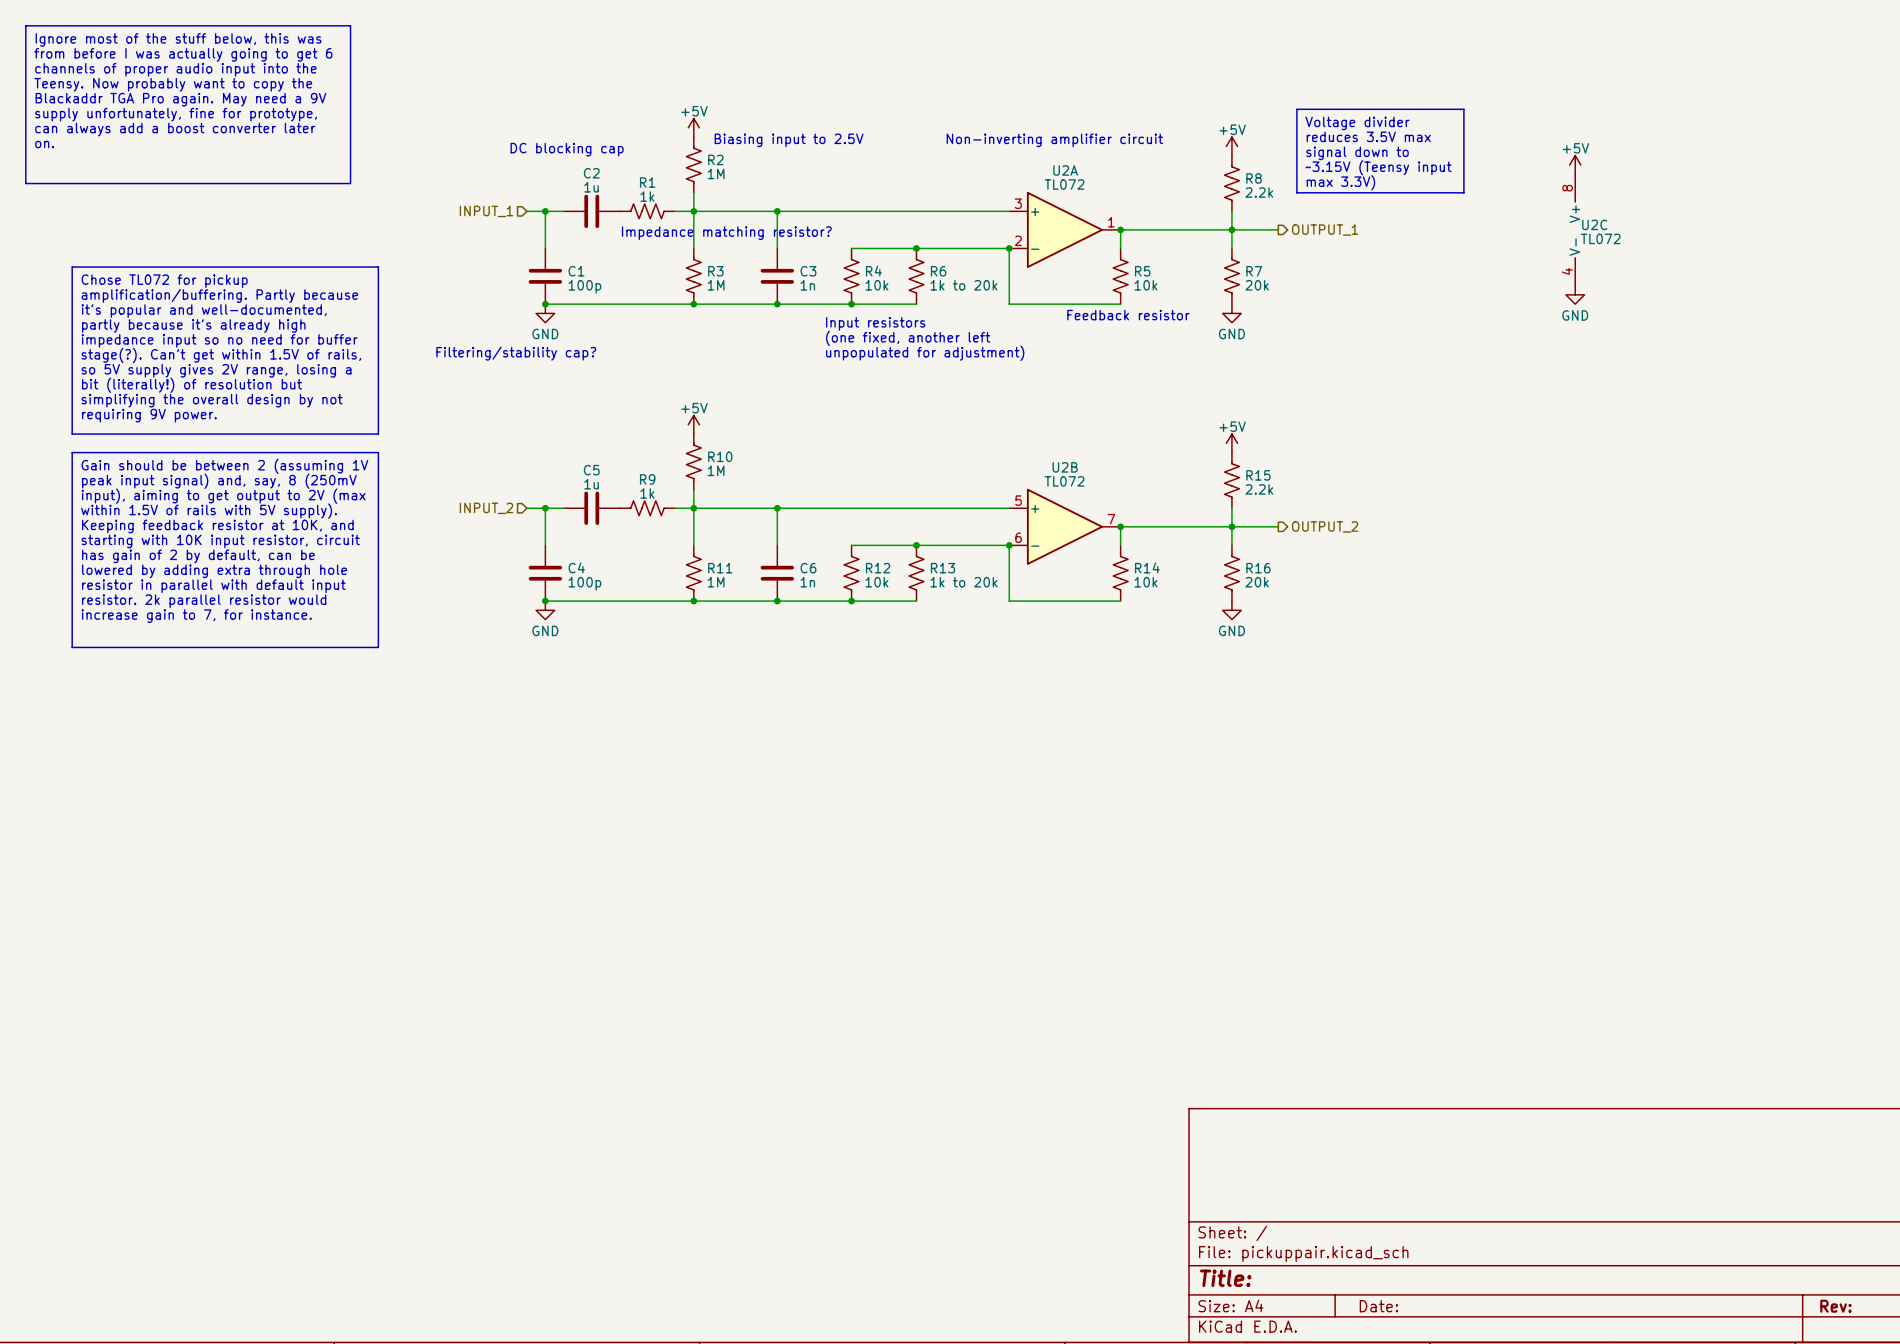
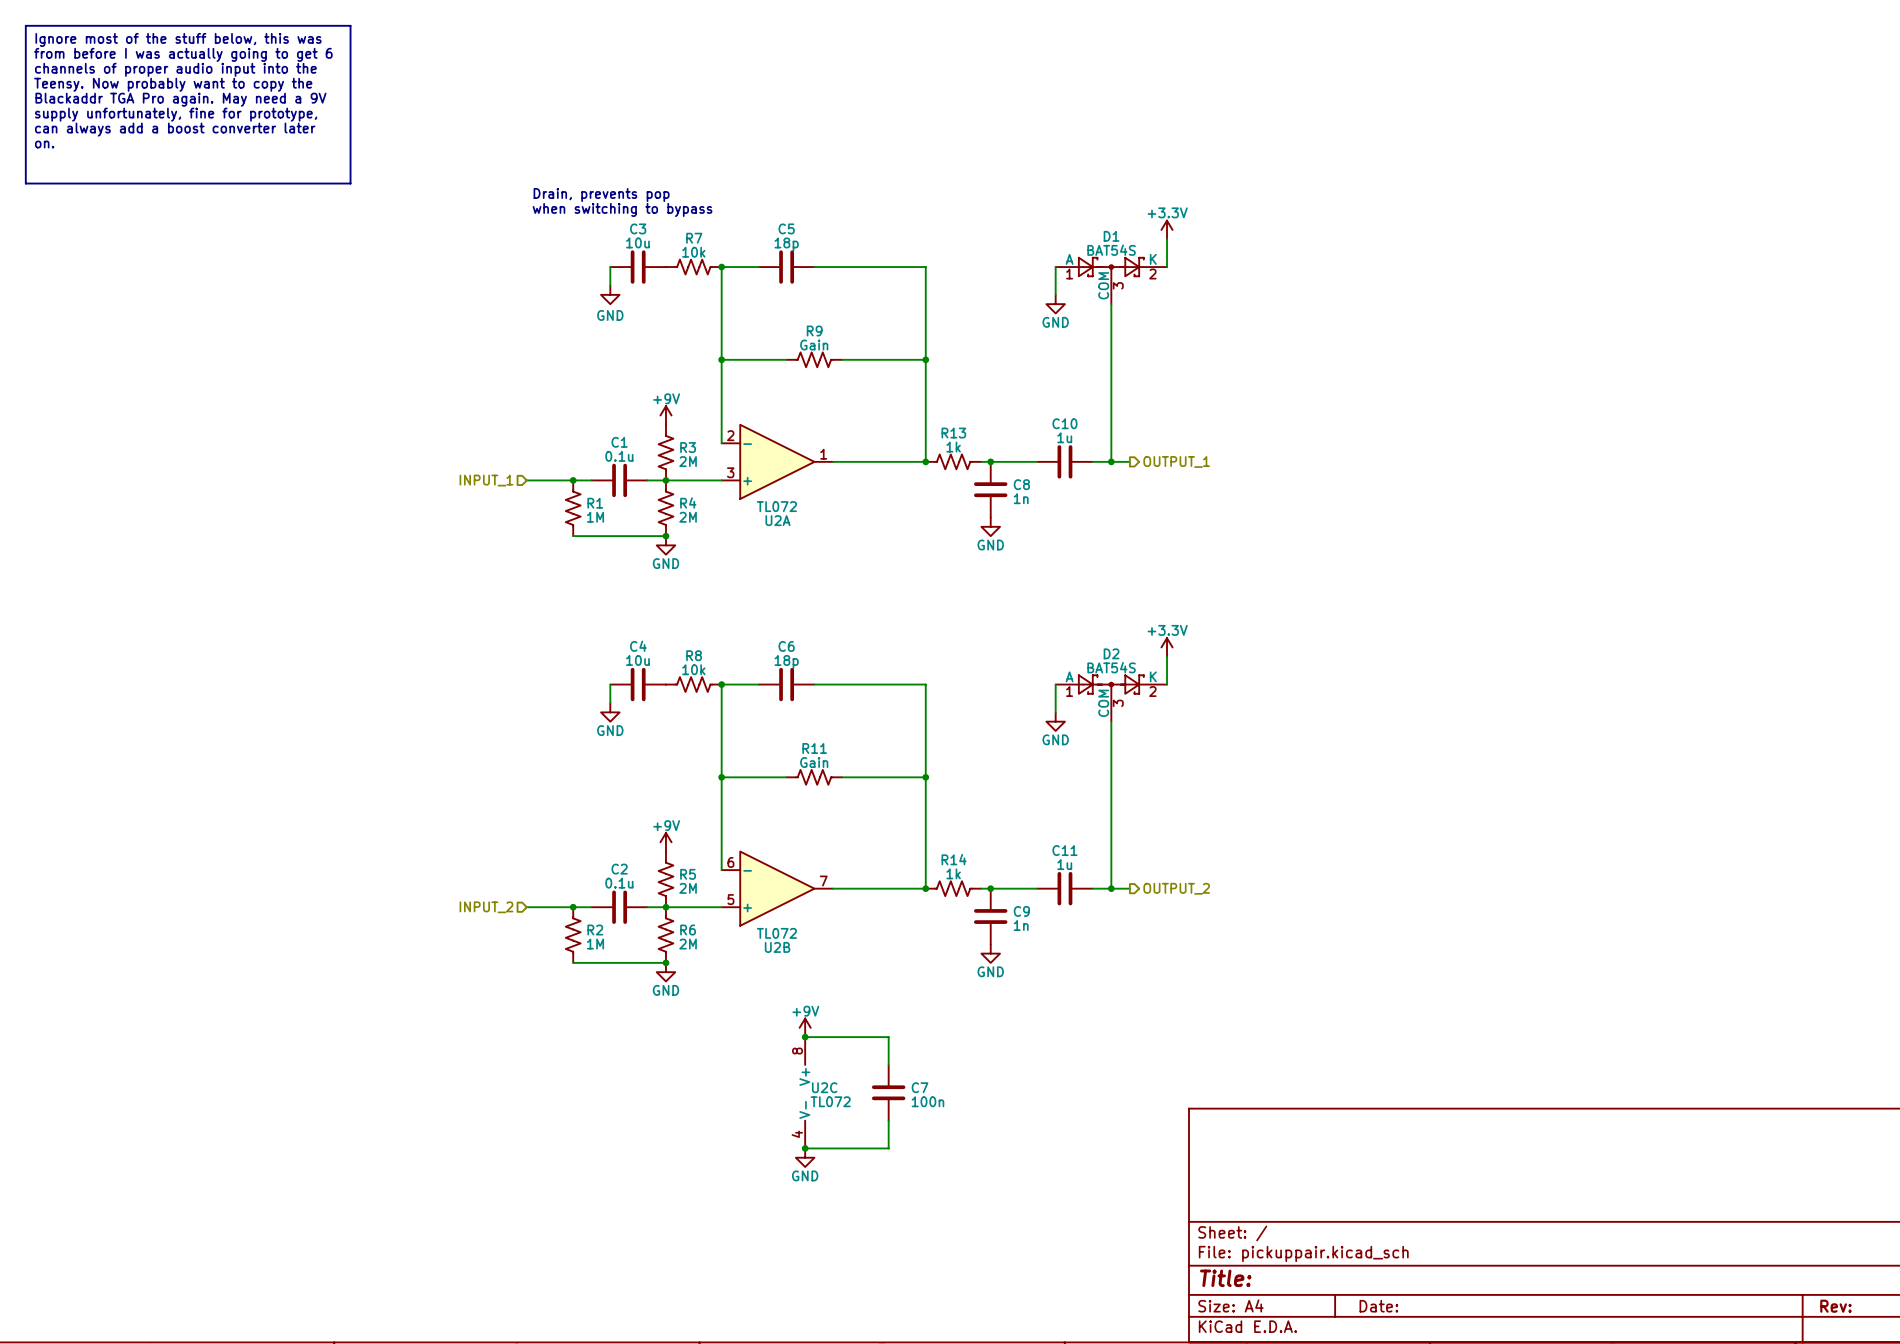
line: (1296, 109) (1463, 109) (1463, 192) (1296, 192) (1296, 109) -> none
text: Voltage divider (1357, 123) -> none
power symbol: +5V (693, 127) -> none
text: reduces 3.5V max (1368, 136) -> none
text: Biasing input to 2.5V (789, 140) -> none
text: Non-inverting amplifier circuit (1054, 140) -> none
power symbol: +5V (1231, 146) -> none
text: DC blocking cap (567, 149) -> none
text: signal down to (1357, 153) -> none
R2 position: (693, 164) -> (573, 935)
power symbol: +5V (1575, 164) -> none
text: ~3.15V (Teensy input (1378, 167) -> none
R8 name position: R8 (1254, 178) -> R8 (694, 655)
text: max 3.3V) (1340, 182) -> none
R8 rotation: 0° (1231, 183) -> 90° clockwise (693, 684)
R8 position: (1231, 183) -> (693, 684)
C2 value: 1u (591, 187) -> 0.1u (619, 883)
wire: (693, 192) (693, 248) -> none
R8 value: 2.2k (1259, 192) -> 10k (693, 669)
text: none -> Drain, prevents pop (601, 195)
R1 value: 1k (647, 196) -> 1M (595, 517)
text: none -> when switching to bypass (622, 209)
hierarchical label: INPUT_1 (486, 211) -> none
wire: (526, 211) (563, 211) -> none
wire: (545, 211) (545, 248) -> none
junction: (545, 211) -> none
C2 position: (591, 211) -> (619, 907)
R1 rotation: 0° (647, 211) -> 90° clockwise (573, 508)
R1 position: (647, 211) -> (573, 508)
wire: (675, 211) (1009, 211) -> none
junction: (693, 211) -> none
wire: (777, 211) (777, 248) -> none
junction: (777, 211) -> none
wire: (1231, 211) (1231, 248) -> none
U2A flip: as is (1064, 229) -> up-down (777, 461)
U2A position: (1064, 229) -> (777, 461)
junction: (1120, 229) -> none
power symbol: none -> +3.3V (1167, 229)
junction: (1231, 229) -> none
wire: (1278, 229) (1120, 229) (1120, 248) -> none
U2C position: (1575, 229) -> (805, 1092)
hierarchical label: OUTPUT_1 (1325, 230) -> none
text: Impedance matching resistor? (726, 233) -> none
wire: none -> (1167, 239) (1167, 267)
wire: (851, 248) (1009, 248) (1009, 304) (1120, 304) -> none
junction: (916, 248) -> none
junction: (1009, 248) -> none
line: (72, 267) (378, 267) (378, 434) (72, 434) (72, 267) -> none
wire: none -> (610, 267) (610, 285)
junction: none -> (721, 267)
wire: none -> (758, 267) (721, 267) (721, 443)
wire: none -> (814, 267) (925, 267) (925, 461) (833, 461)
wire: none -> (1055, 267) (1055, 294)
C1 name position: C1 (576, 271) -> C1 (619, 442)
C3 name position: C3 (808, 271) -> C3 (638, 228)
R7 name position: R7 (1254, 271) -> R7 (694, 238)
C1 rotation: 0° (545, 276) -> 90° clockwise (619, 480)
C1 position: (545, 276) -> (619, 480)
R3 position: (693, 276) -> (665, 452)
C3 rotation: 0° (777, 276) -> 90° clockwise (638, 267)
C3 position: (777, 276) -> (638, 267)
R4 position: (851, 276) -> (665, 508)
R6 position: (916, 276) -> (665, 935)
R5 position: (1120, 276) -> (665, 879)
R7 rotation: 0° (1231, 276) -> 90° clockwise (693, 267)
R7 position: (1231, 276) -> (693, 267)
D1: none -> BAT54S (1111, 280)
text: Chose TL072 for pickup (164, 281) -> none
R3 value: 1M (716, 285) -> 2M (688, 461)
C3 value: 1n (807, 285) -> 10u (637, 242)
R4 value: 10k (876, 285) -> 2M (688, 517)
R6 value: 1k to 20k (963, 285) -> 2M (688, 944)
R5 value: 10k (1146, 285) -> 2M (688, 888)
R7 value: 20k (1257, 285) -> 10k (693, 252)
C1 value: 100p (584, 286) -> 0.1u (619, 456)
power symbol: GND (1575, 294) -> none
text: amplification/buffering. Partly because (219, 295) -> none
wire: (545, 304) (916, 304) -> none
junction: (545, 304) -> none
junction: (693, 304) -> none
junction: (777, 304) -> none
junction: (851, 304) -> none
power symbol: none -> GND (1055, 304)
wire: none -> (1111, 304) (1111, 461)
text: it's popular and well-documented, (204, 311) -> none
power symbol position: GND (545, 313) -> GND (610, 294)
power symbol: GND (1231, 313) -> none
text: Feedback resistor (1128, 315) -> none
text: Input resistors (875, 323) -> none
text: partly because it's already high (193, 325) -> none
text: (one fixed, another left (908, 338) -> none
text: impedance input so no need for buffer (219, 340) -> none
text: Filtering/stability cap? (516, 353) -> none
text: unpopulated for adjustment) (925, 353) -> none
text: stage(?). Can't get within 1.5V of rails, (221, 355) -> none
wire: none -> (721, 359) (786, 359)
junction: none -> (721, 359)
wire: none -> (842, 359) (925, 359)
junction: none -> (925, 359)
text: so 5V supply gives 2V range, losing a (216, 370) -> none
text: bit (literally!) of resolution but (192, 385) -> none
text: simplifying the overall design by not (212, 400) -> none
text: requiring 9V power. (149, 415) -> none
power symbol: none -> +9V (665, 415)
power symbol: +5V (693, 424) -> none
power symbol: +5V (1231, 443) -> none
line: (72, 452) (72, 647) (378, 647) (378, 452) (72, 452) -> none
R10: 1M (693, 461) -> none
junction: none -> (925, 461)
wire: none -> (981, 461) (1037, 461)
junction: none -> (990, 461)
C10: none -> 1u (1064, 461)
wire: none -> (1092, 461) (1129, 461)
junction: none -> (1111, 461)
hierarchical label: none -> OUTPUT_1 (1176, 461)
text: Gain should be between 2 (assuming 1V (224, 466) -> none
hierarchical label: none -> INPUT_1 (486, 480)
wire: none -> (526, 480) (591, 480)
wire: none -> (647, 480) (721, 480)
junction: none -> (665, 480)
R15: 2.2k (1231, 480) -> none
text: peak input signal) and, say, 8 (250mV (219, 481) -> none
C5 value: 1u (591, 484) -> 18p (786, 244)
wire: (693, 489) (693, 545) -> none
C8: none -> 1n (990, 489)
R9 value: 1k (647, 493) -> Gain (814, 345)
text: input), aiming to get output to 2V (max (223, 496) -> none
hierarchical label: INPUT_2 (486, 508) -> none
wire: (526, 508) (563, 508) -> none
wire: (545, 508) (545, 545) -> none
junction position: (545, 508) -> (573, 480)
C5 position: (591, 508) -> (786, 267)
R9 position: (647, 508) -> (814, 359)
wire: (675, 508) (1009, 508) -> none
junction: (693, 508) -> none
wire: (777, 508) (777, 545) -> none
junction: (777, 508) -> none
wire: (1231, 508) (1231, 545) -> none
text: within 1.5V of rails with 5V supply). (209, 511) -> none
text: Keeping feedback resistor at 10K, and (217, 526) -> none
power symbol: none -> GND (990, 526)
U2B flip: as is (1064, 526) -> up-down (777, 888)
U2B position: (1064, 526) -> (777, 888)
junction: (1120, 526) -> none
junction: (1231, 526) -> none
wire: (1278, 526) (1120, 526) (1120, 545) -> none
hierarchical label: OUTPUT_2 (1325, 526) -> none
wire: none -> (573, 536) (665, 536)
junction: none -> (665, 536)
text: starting with 10K input resistor, circuit (220, 541) -> none
power symbol: none -> GND (665, 545)
wire: (851, 545) (1009, 545) (1009, 601) (1120, 601) -> none
junction: (916, 545) -> none
junction: (1009, 545) -> none
text: has gain of 2 by default, can be (198, 556) -> none
C4 name position: C4 (576, 567) -> C4 (638, 646)
R14 name position: R14 (1147, 567) -> R14 (954, 859)
R11 name position: R11 (720, 568) -> R11 (814, 748)
C6 name position: C6 (808, 568) -> C6 (786, 646)
R13 name position: R13 (942, 568) -> R13 (953, 433)
text: lowered by adding extra through hole (214, 571) -> none
C4 rotation: 0° (545, 573) -> 90° clockwise (638, 684)
C4 position: (545, 573) -> (638, 684)
R11 rotation: 0° (693, 573) -> 90° clockwise (814, 777)
R11 position: (693, 573) -> (814, 777)
C6 rotation: 0° (777, 573) -> 90° clockwise (786, 684)
C6 position: (777, 573) -> (786, 684)
R12: 10k (851, 573) -> none
R13 rotation: 0° (916, 573) -> 90° clockwise (953, 461)
R13 position: (916, 573) -> (953, 461)
R14 rotation: 0° (1120, 573) -> 90° clockwise (953, 888)
R14 position: (1120, 573) -> (953, 888)
R16: 20k (1231, 573) -> none
R11 value: 1M (716, 582) -> Gain (814, 762)
C6 value: 1n (807, 582) -> 18p (786, 662)
R13 value: 1k to 20k (963, 582) -> 1k (953, 447)
R14 value: 10k (1146, 582) -> 1k (953, 873)
C4 value: 100p (584, 583) -> 10u (637, 660)
text: resistor in parallel with default input (213, 586) -> none
text: resistor. 2k parallel resistor would (204, 601) -> none
wire: (545, 601) (916, 601) -> none
junction: (545, 601) -> none
junction: (693, 601) -> none
junction: (777, 601) -> none
junction: (851, 601) -> none
power symbol: GND (545, 610) -> none
power symbol: GND (1231, 610) -> none
text: increase gain to 7, for instance. (196, 616) -> none
power symbol: none -> +3.3V (1167, 647)
wire: none -> (1167, 656) (1167, 684)
wire: none -> (610, 684) (610, 703)
junction: none -> (721, 684)
wire: none -> (758, 684) (721, 684) (721, 870)
wire: none -> (814, 684) (925, 684) (925, 888) (833, 888)
wire: none -> (1055, 684) (1055, 712)
D2: none -> BAT54S (1111, 698)
power symbol: none -> GND (610, 712)
power symbol: none -> GND (1055, 721)
wire: none -> (1111, 721) (1111, 888)
wire: none -> (721, 777) (786, 777)
junction: none -> (721, 777)
wire: none -> (842, 777) (925, 777)
junction: none -> (925, 777)
power symbol: none -> +9V (665, 842)
junction: none -> (925, 888)
wire: none -> (981, 888) (1037, 888)
junction: none -> (990, 888)
C11: none -> 1u (1064, 888)
wire: none -> (1092, 888) (1129, 888)
junction: none -> (1111, 888)
hierarchical label: none -> OUTPUT_2 (1176, 888)
hierarchical label: none -> INPUT_2 (486, 907)
wire: none -> (526, 907) (591, 907)
junction: none -> (573, 907)
wire: none -> (647, 907) (721, 907)
junction: none -> (665, 907)
C9: none -> 1n (990, 916)
power symbol: none -> GND (990, 953)
wire: none -> (573, 962) (665, 962)
junction: none -> (665, 962)
power symbol: none -> GND (665, 972)
power symbol: none -> +9V (805, 1027)
wire: none -> (805, 1037) (888, 1037) (888, 1064)
junction: none -> (805, 1037)
C7: none -> 100n (888, 1092)
wire: none -> (888, 1120) (888, 1148) (805, 1148)
junction: none -> (805, 1148)
power symbol: none -> GND (805, 1157)

